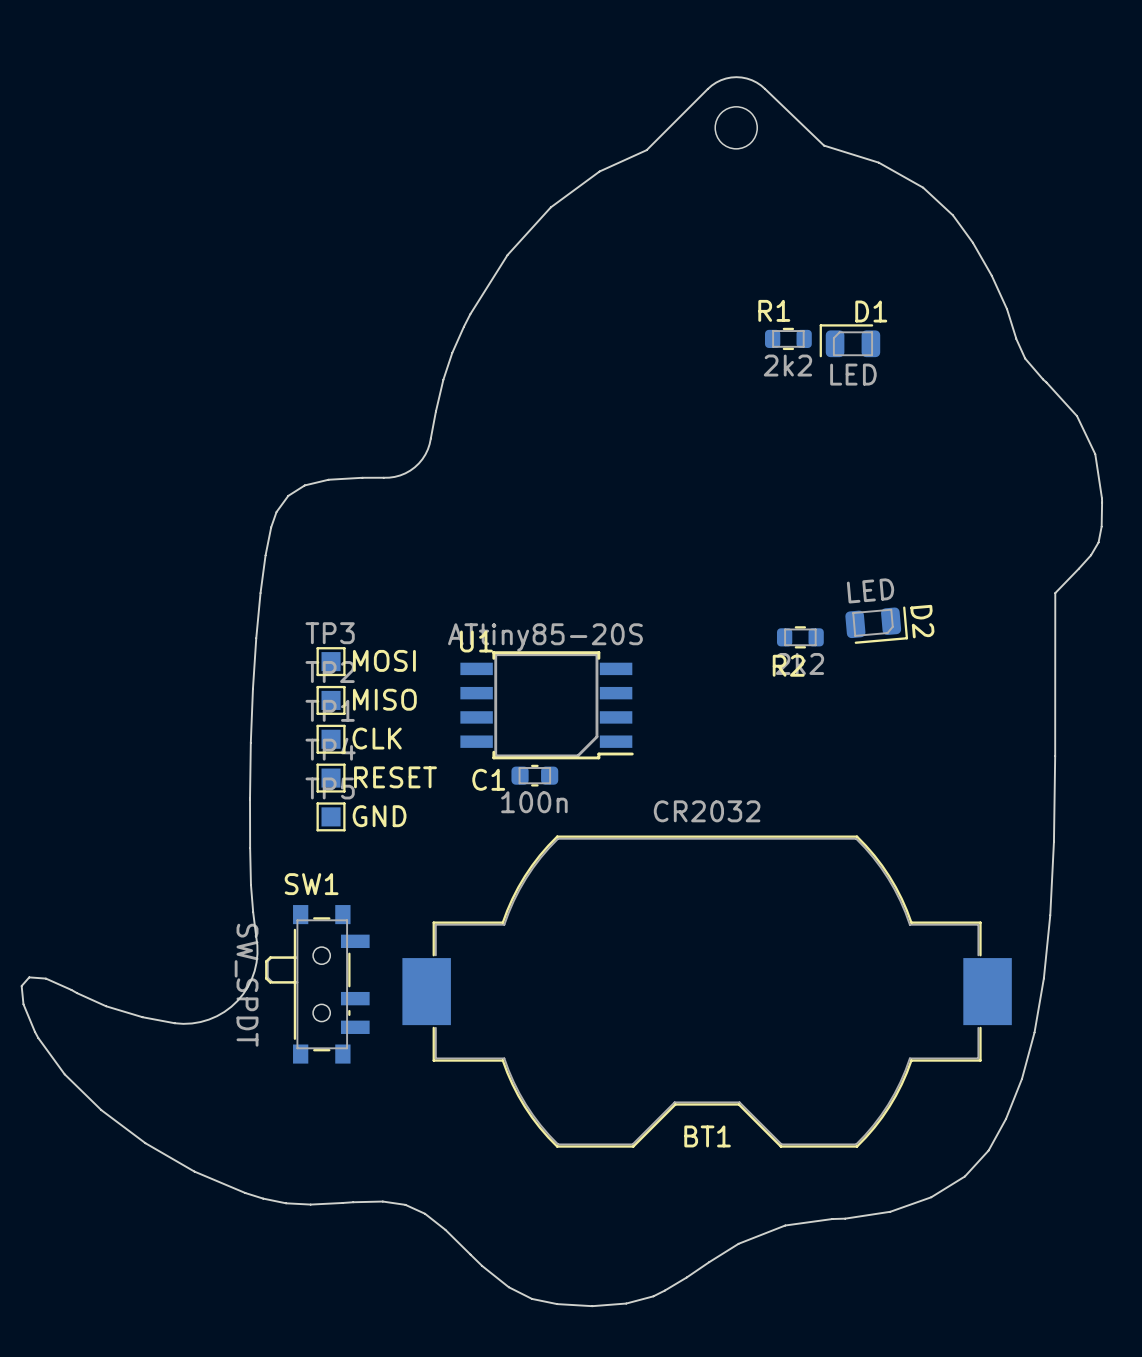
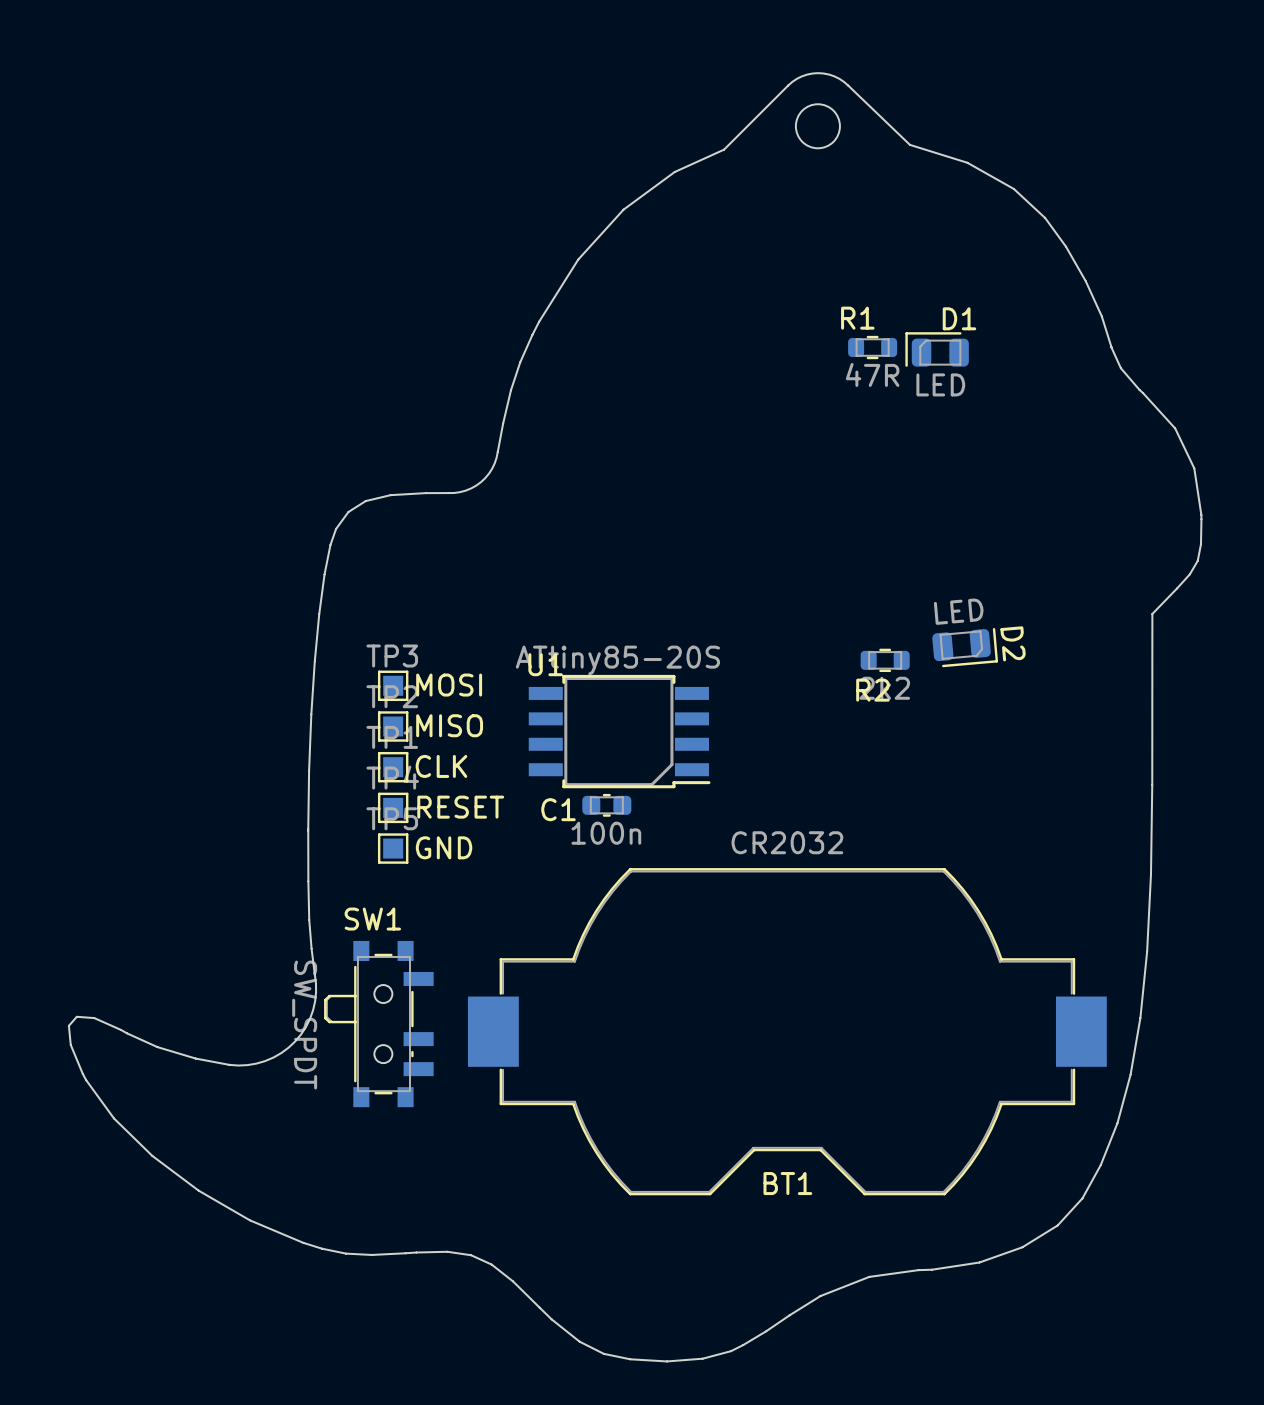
R1 value: 2k2 (787, 365) -> 47R (872, 374)

